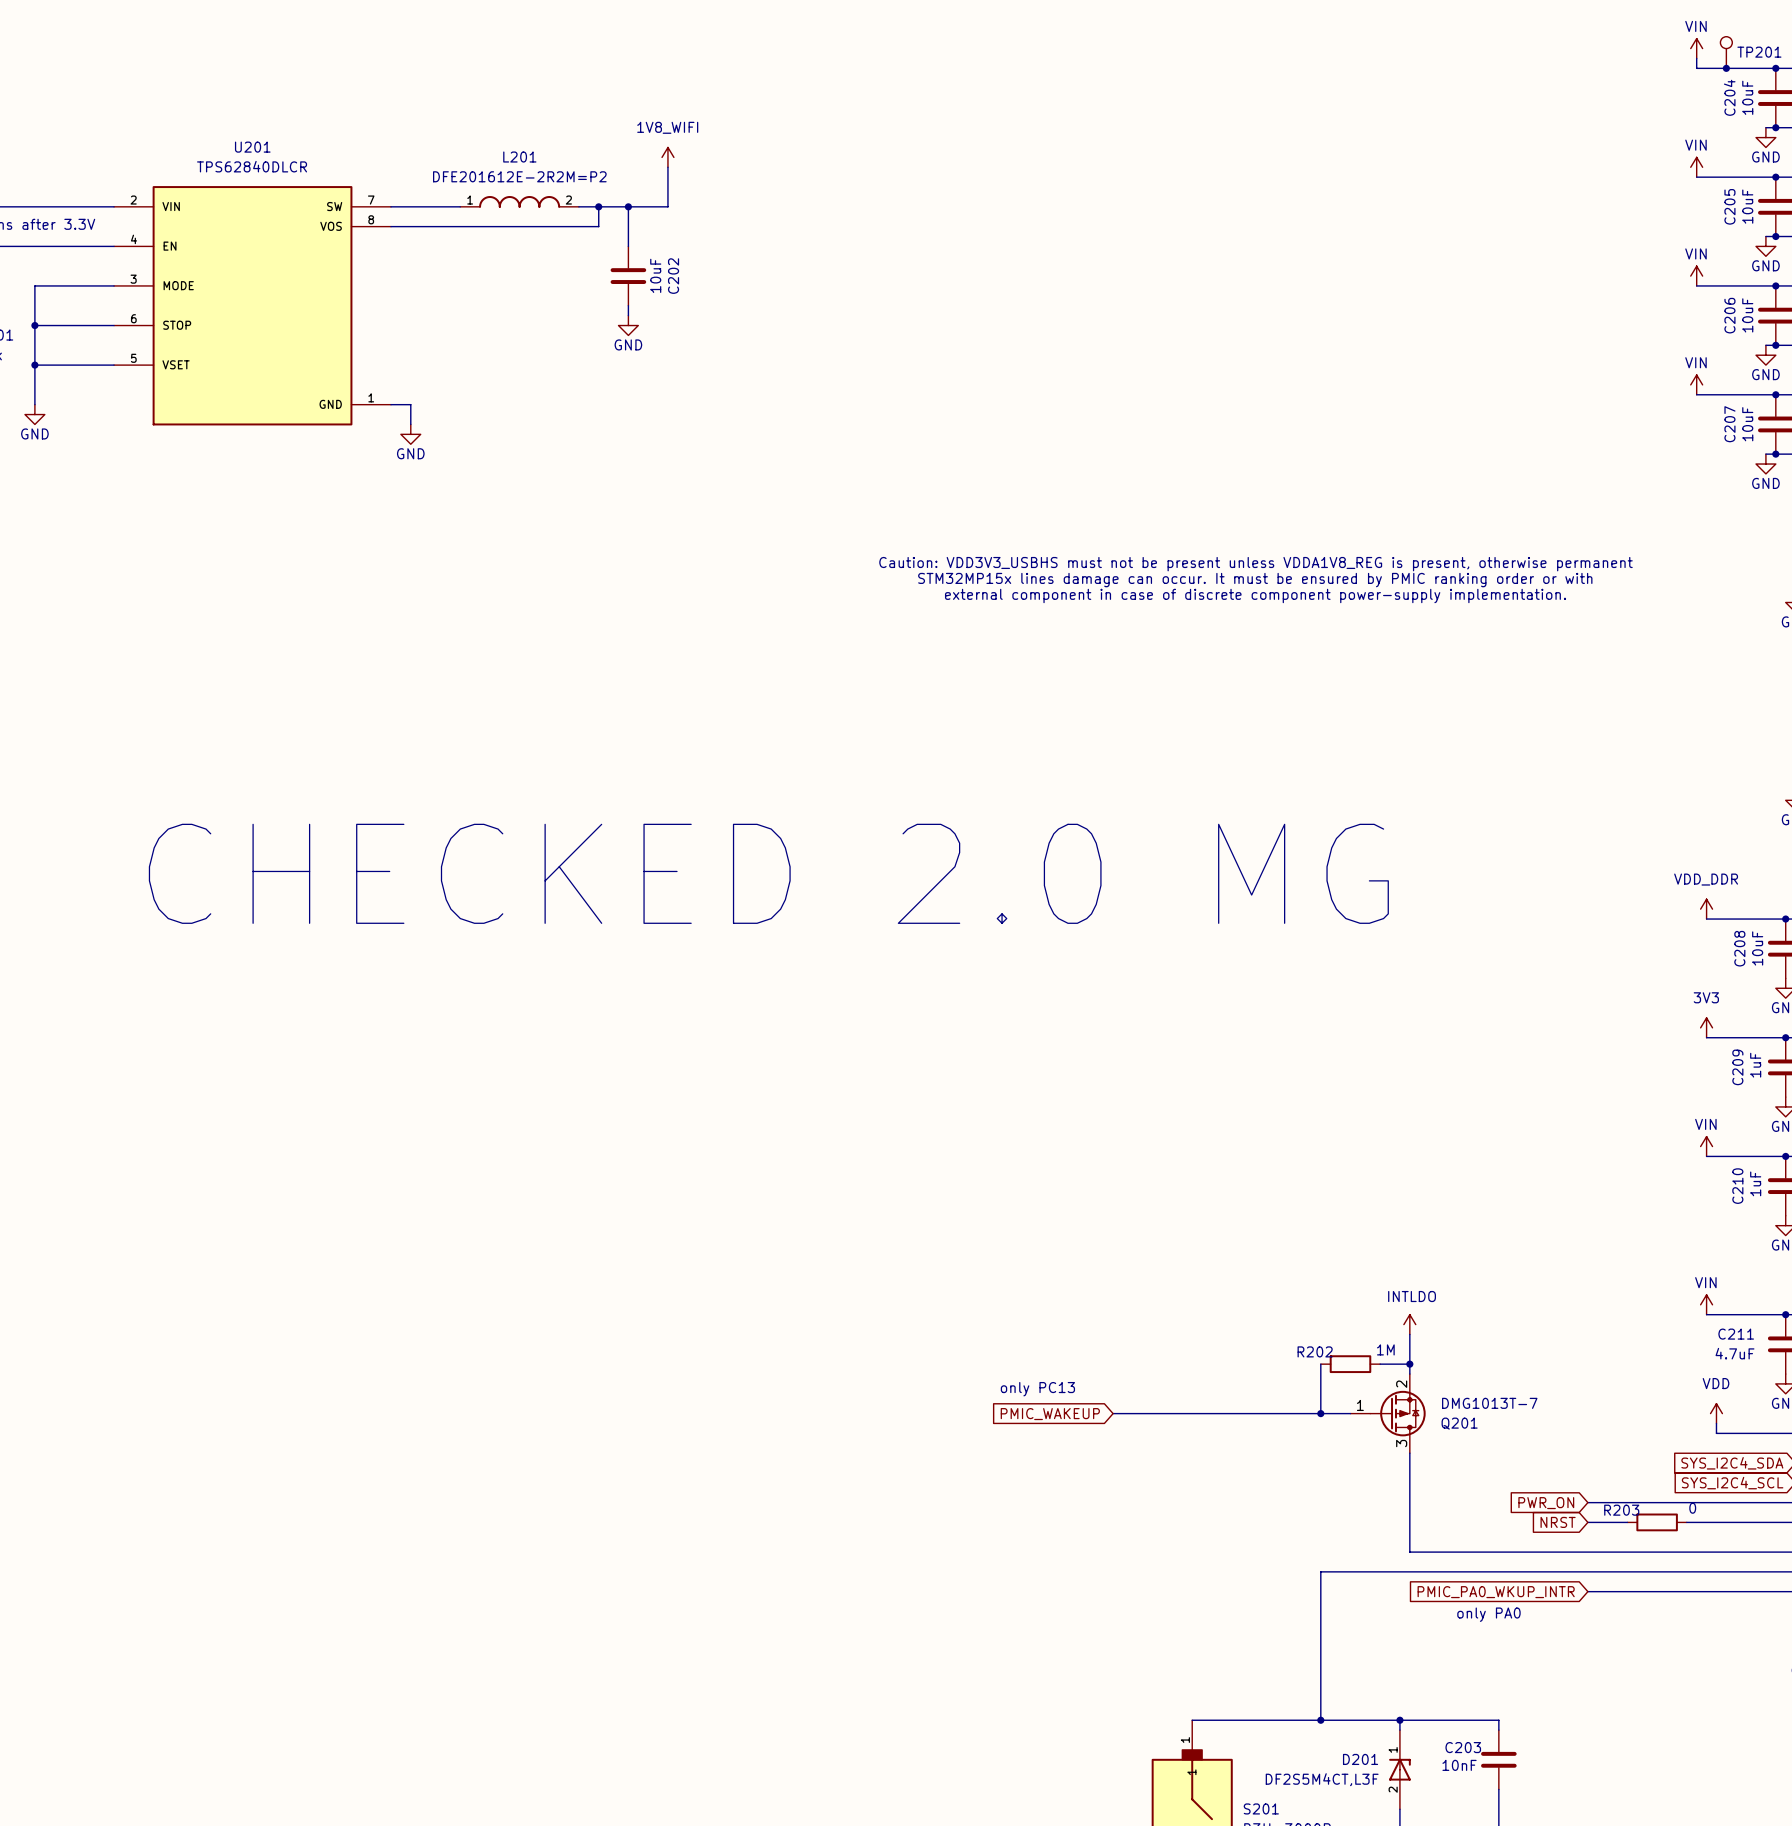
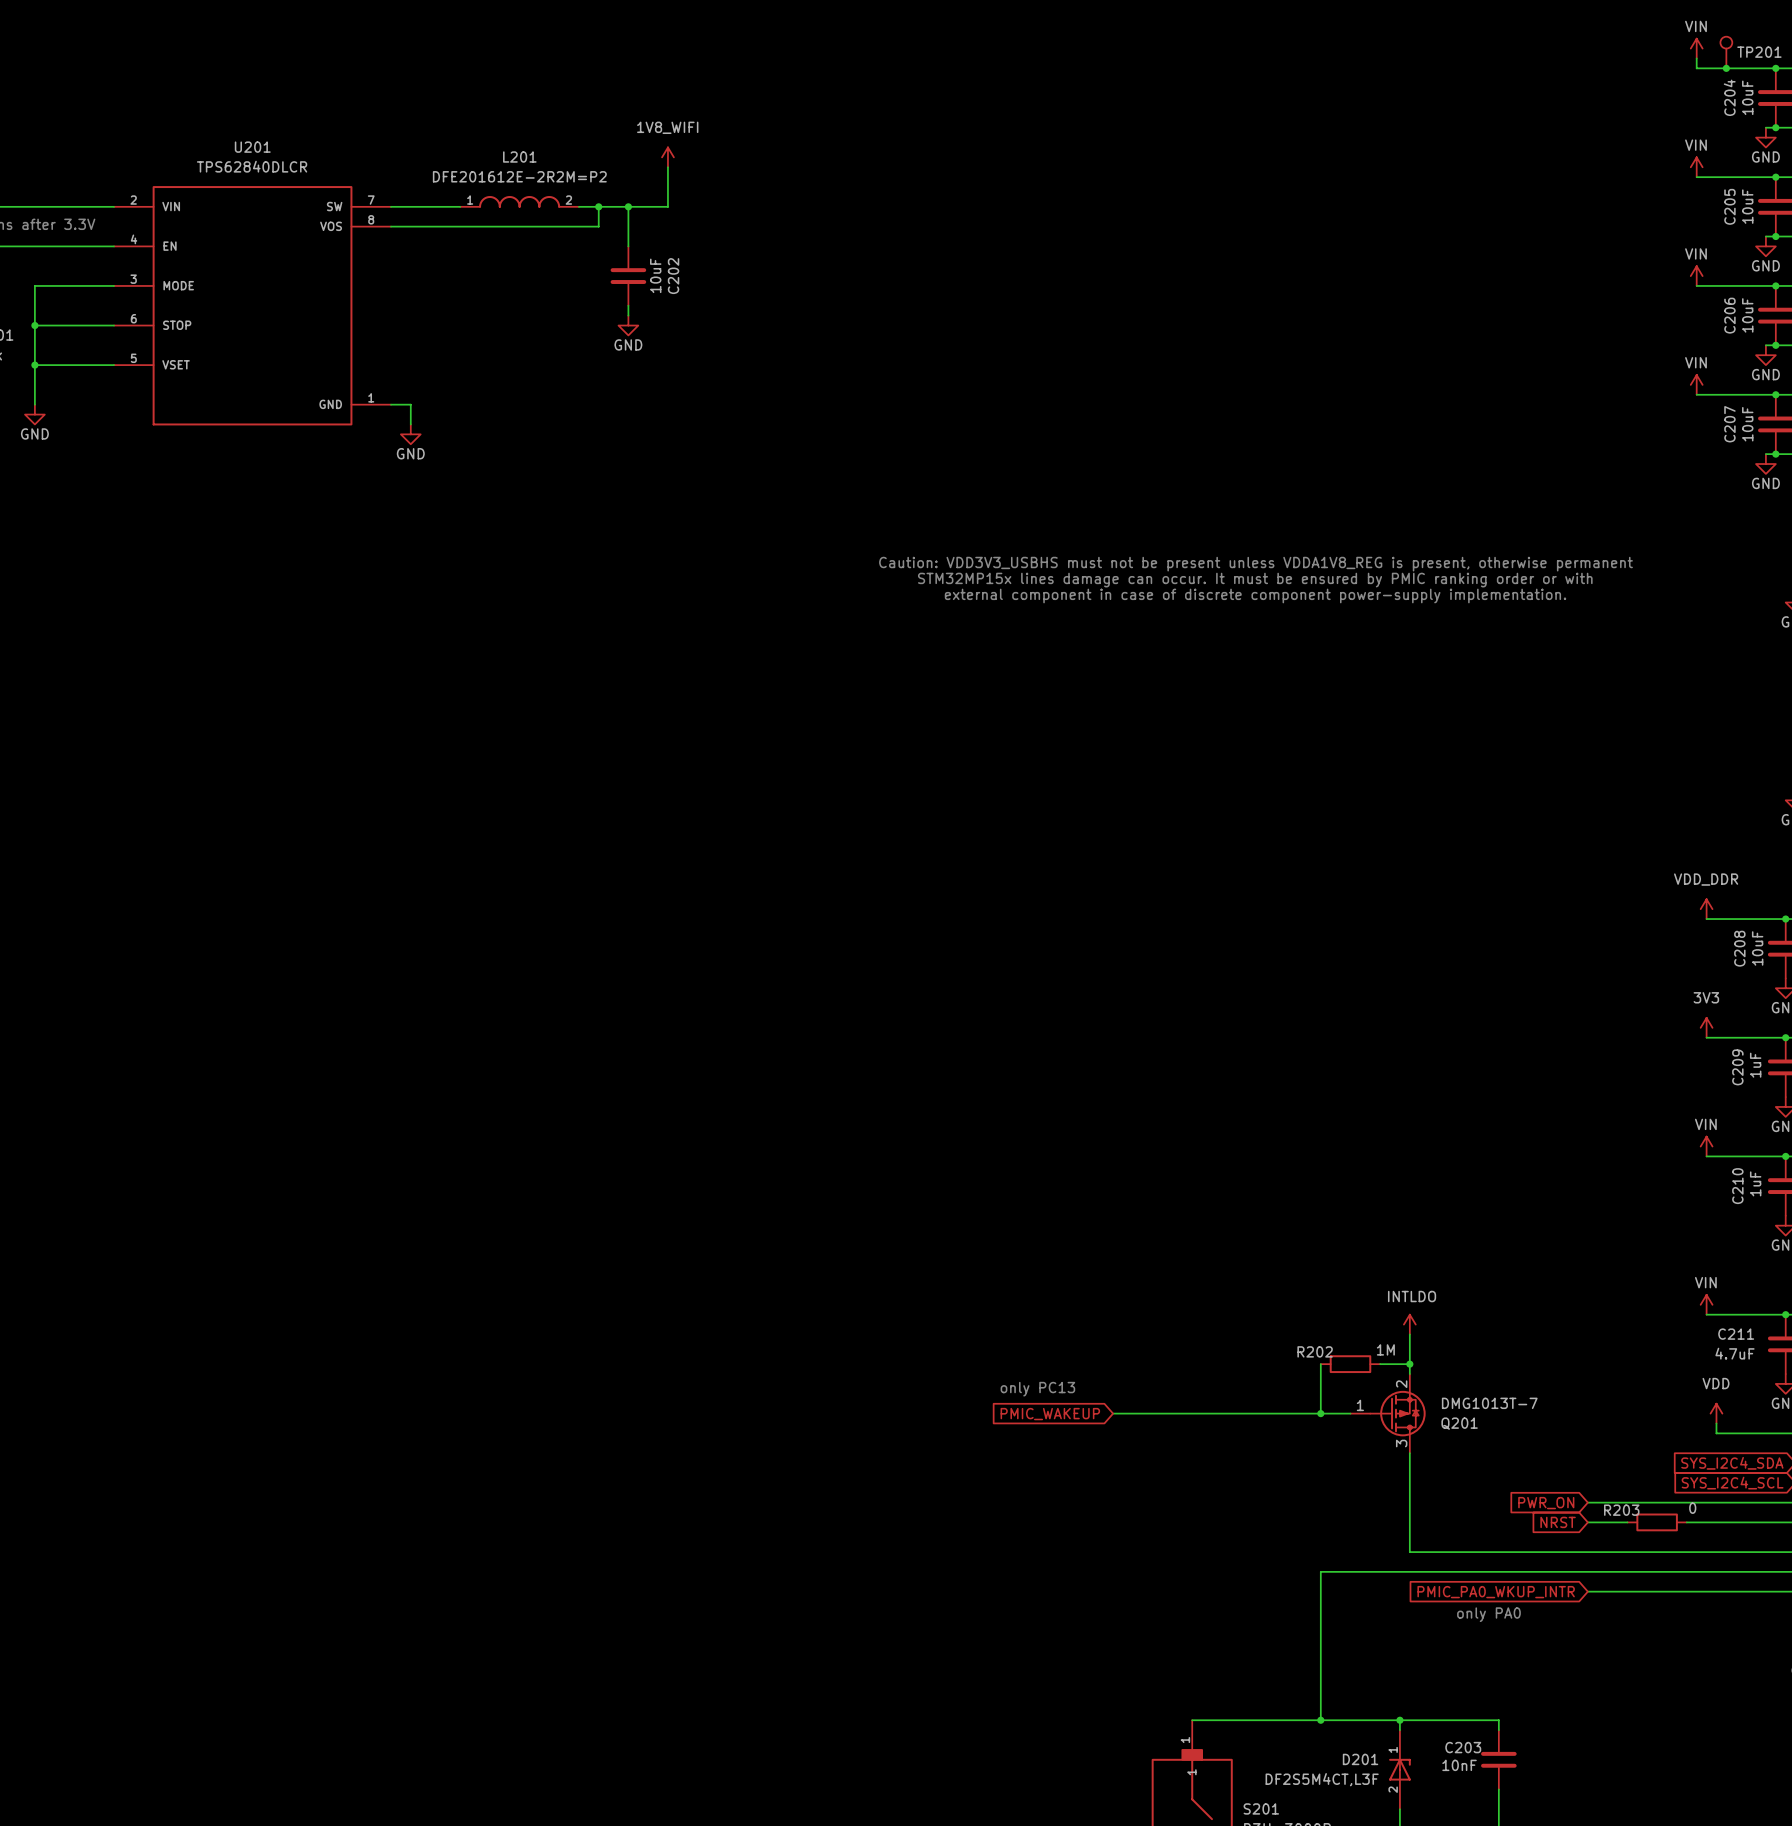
text: CHECKED 2.0 MG (768, 873) -> none

